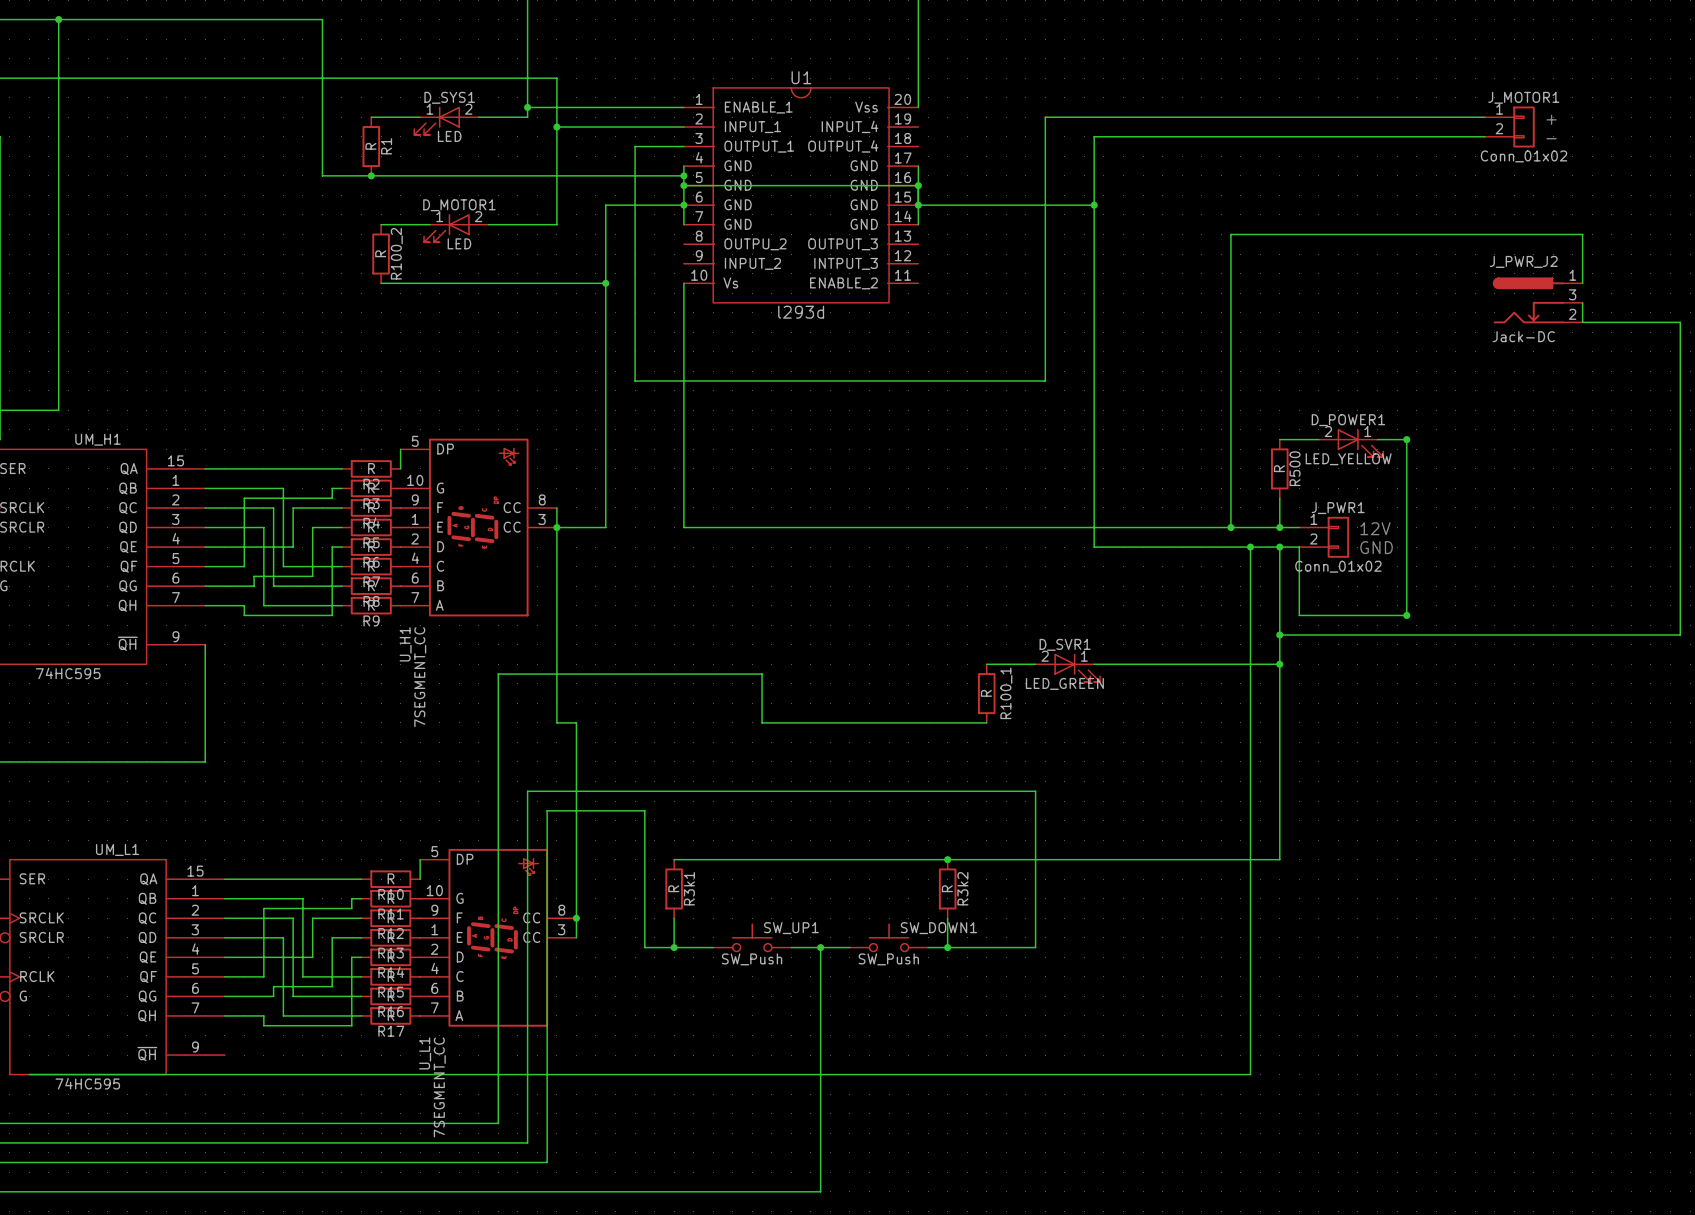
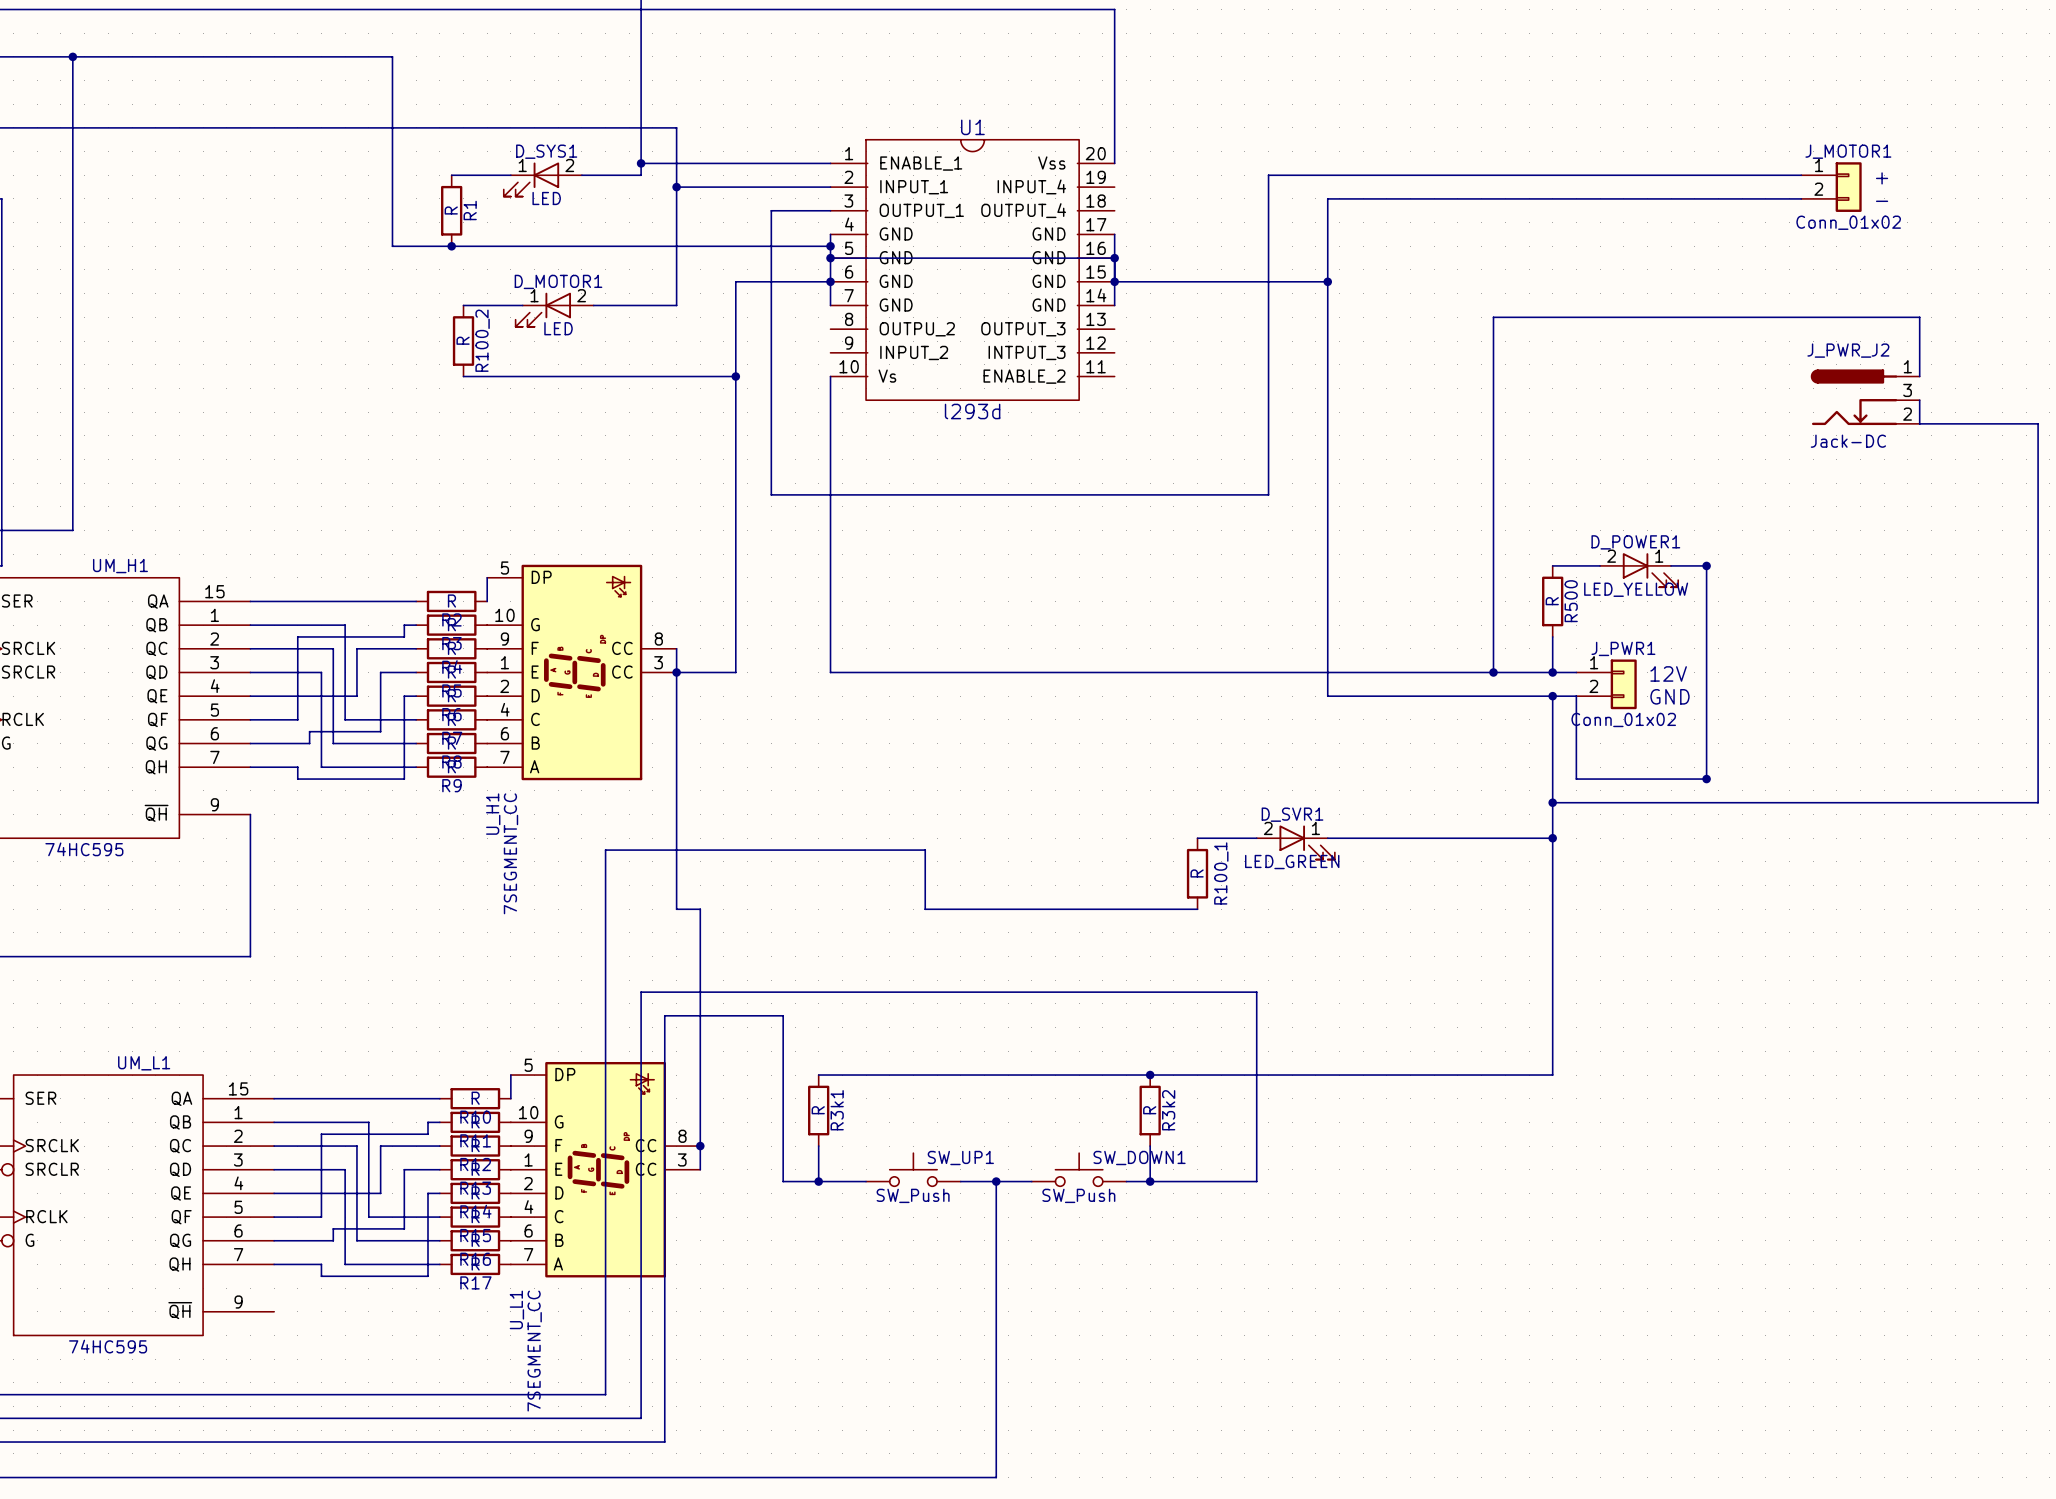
wire: (1250, 547) (1250, 1074) (29, 1074) -> none
junction: (1250, 547) -> none

